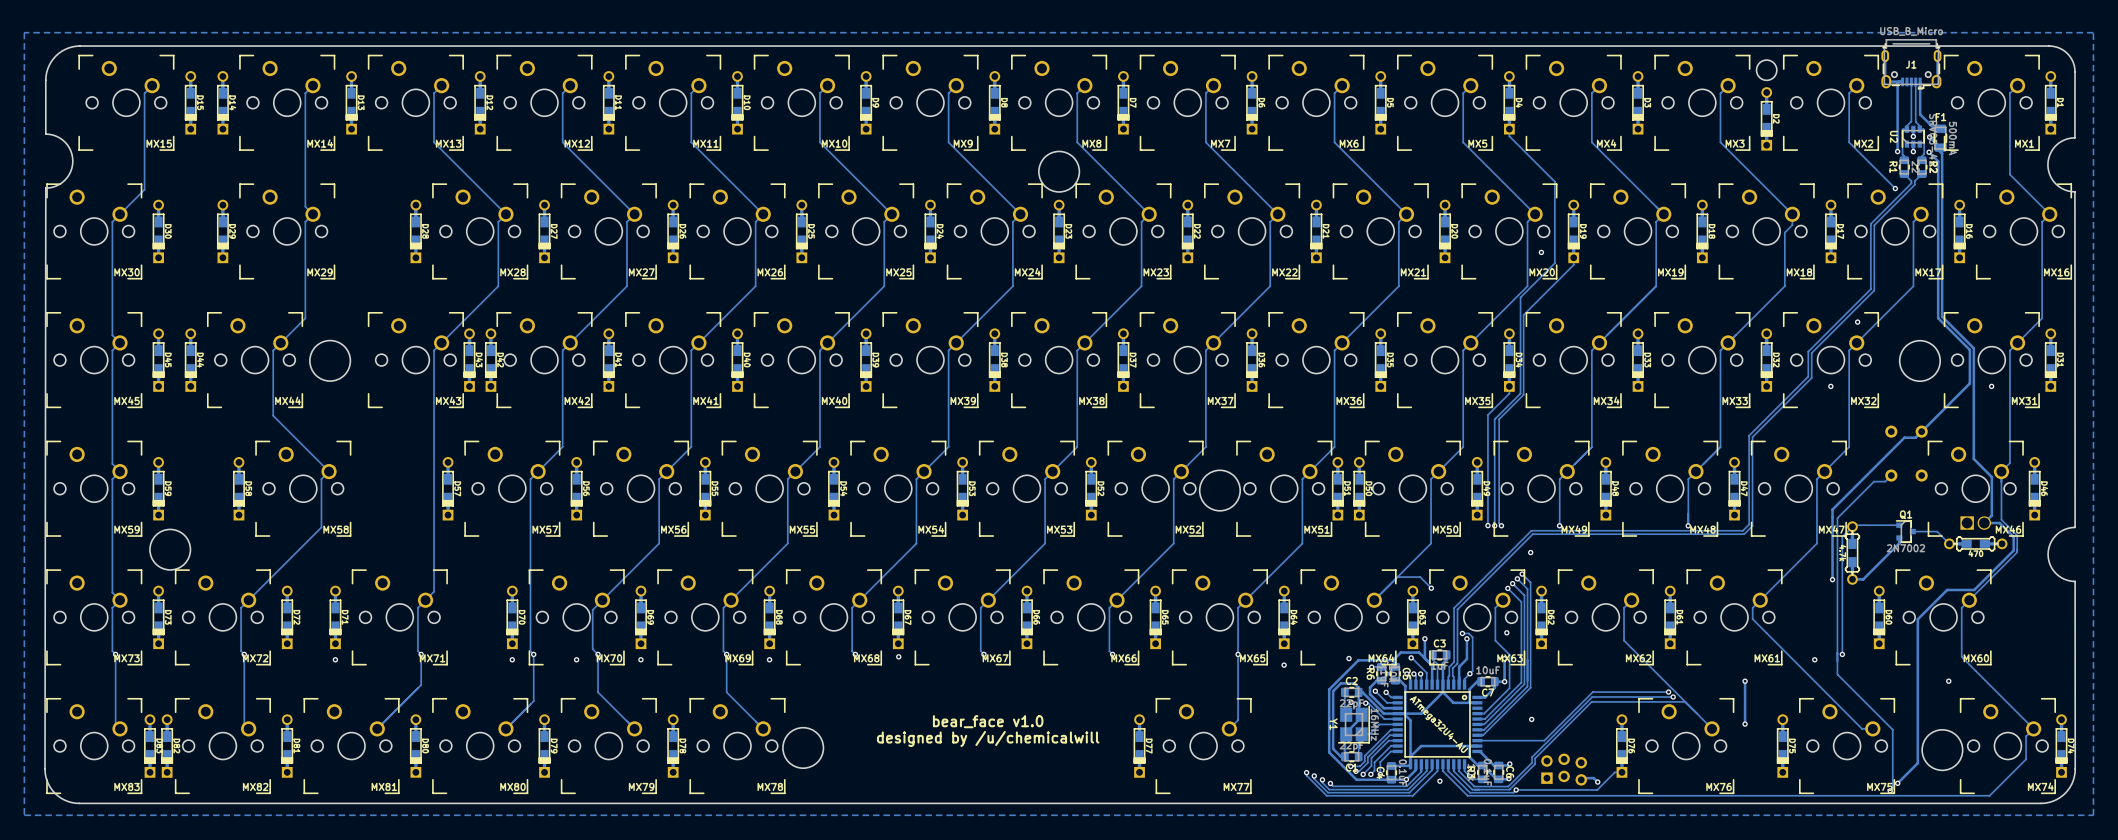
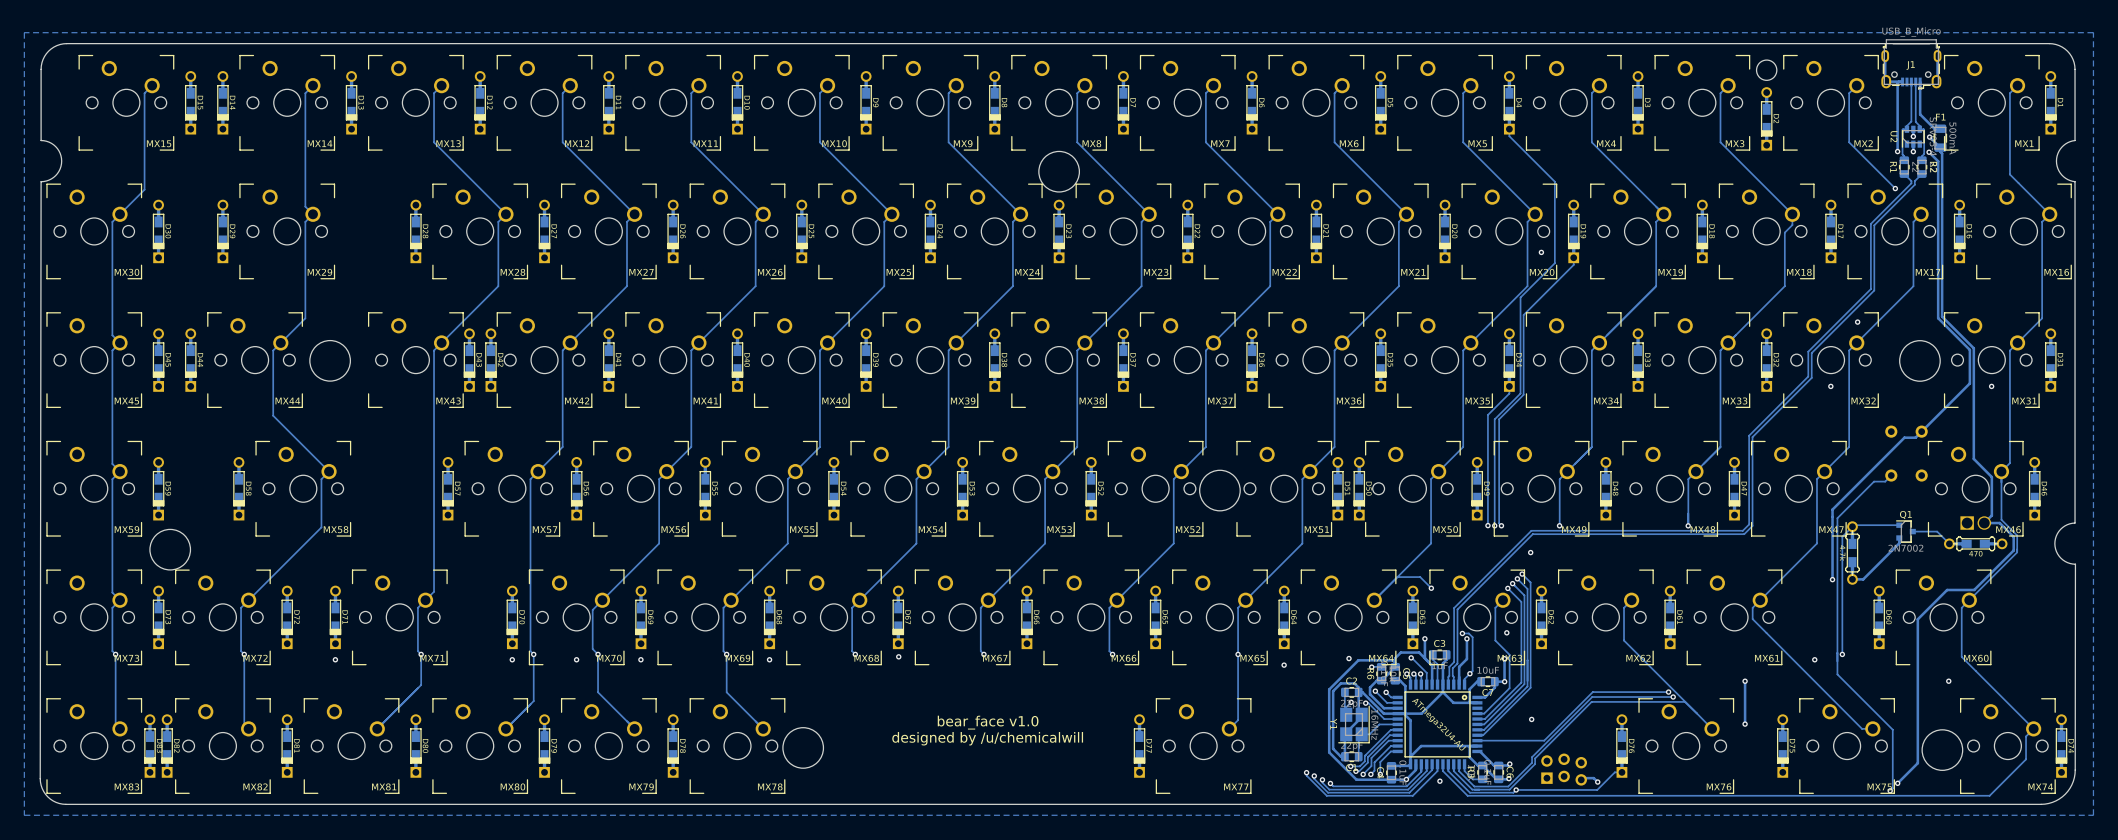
board edge: (79, 46) (2049, 46) (2059, 48) (2069, 56) (2074, 68) (2074, 137) (2064, 139) (2055, 145) (2049, 154) (2047, 164) (2049, 175) (2055, 183) (2064, 189) (2074, 191) (2075, 527) (2064, 529) (2055, 535) (2050, 544) (2048, 554) (2050, 564) (2055, 573) (2064, 579) (2075, 581) (2075, 769) (2073, 780) (2062, 795) (2052, 801) (2041, 803) (79, 803) (68, 801) (52, 790) (46, 780) (44, 769) (45, 188) (56, 186) (64, 180) (70, 171) (72, 161) (70, 150) (64, 142) (56, 136) (45, 134) (45, 80) (49, 65) (55, 56) (65, 49) (79, 46) -> (2049, 43) (2059, 45) (2067, 51) (2073, 59) (2075, 69) (2075, 140) (2061, 147) (2056, 161) (2061, 174) (2075, 181) (2075, 523) (2067, 524) (2060, 529) (2056, 536) (2054, 543) (2056, 551) (2060, 558) (2067, 562) (2075, 564) (2075, 770) (2070, 788) (2062, 796) (2052, 802) (2041, 804) (65, 804) (50, 799) (42, 788) (40, 778) (41, 181) (48, 180) (55, 175) (60, 168) (61, 161) (60, 153) (55, 146) (48, 142) (41, 140) (41, 69) (44, 56) (56, 45) (66, 43) (2049, 43)

